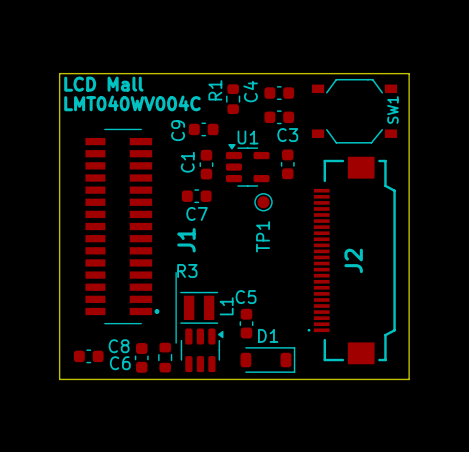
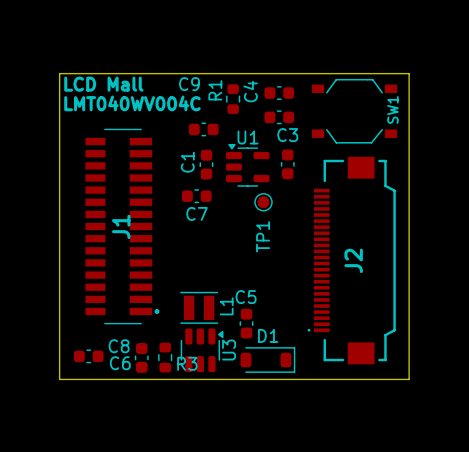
C9 name rotation: 0° (178, 130) -> 90° clockwise (189, 84)
C9 name position: C9 (178, 130) -> C9 (189, 84)
J1 name position: J1 (186, 240) -> J1 (121, 226)
R3 name position: R3 (187, 270) -> R3 (187, 363)
line: (176, 272) (176, 343) -> none
U3 name: none -> U3 (229, 350)

